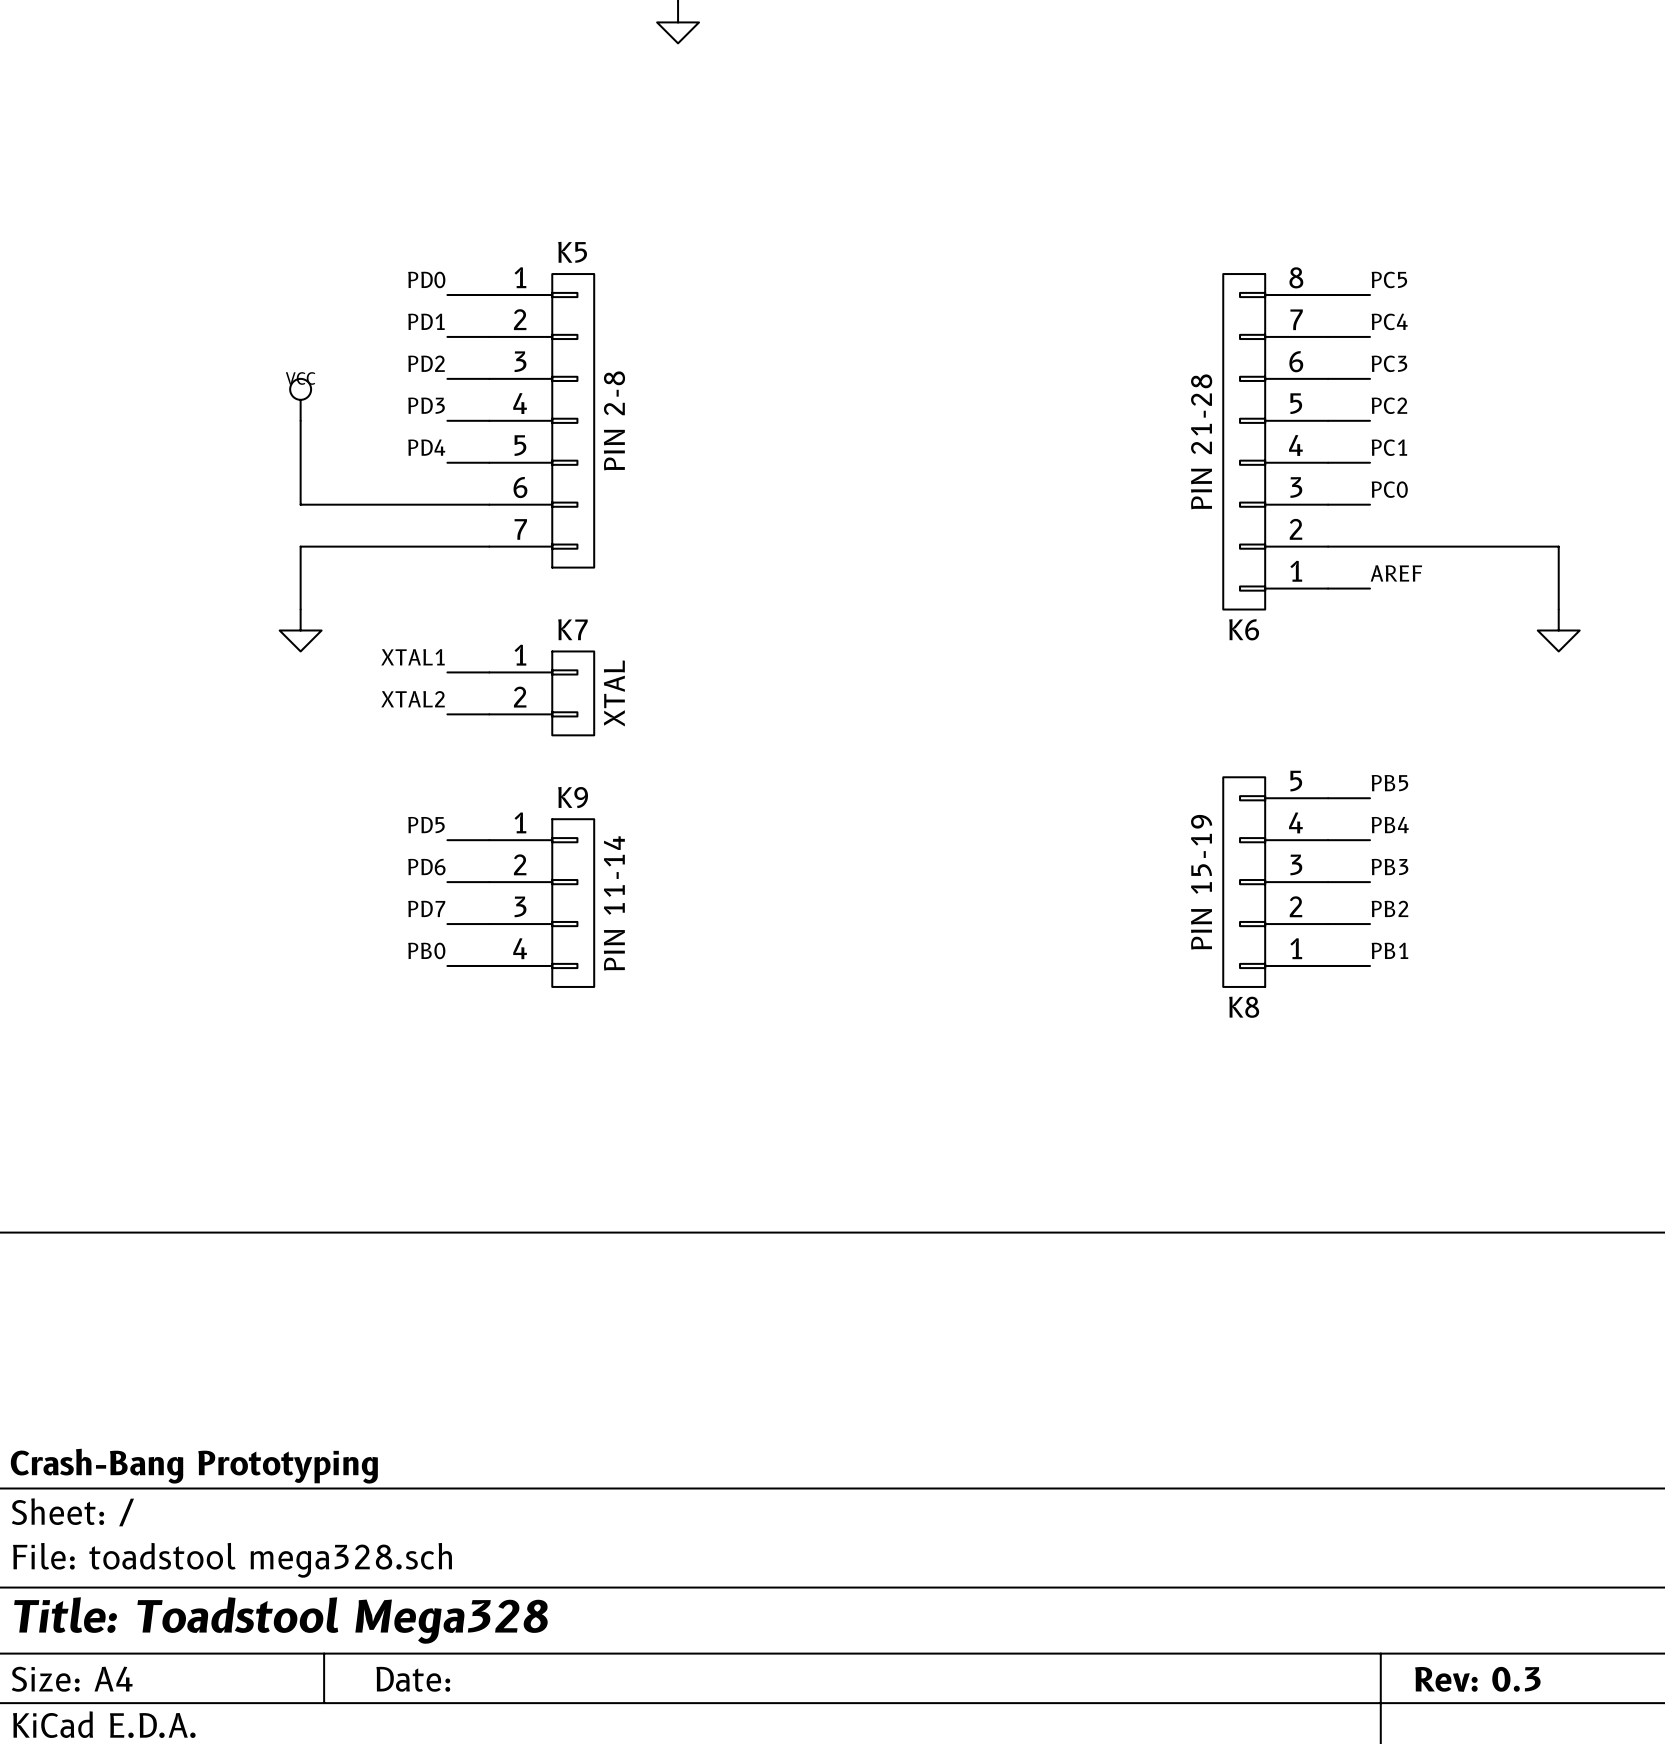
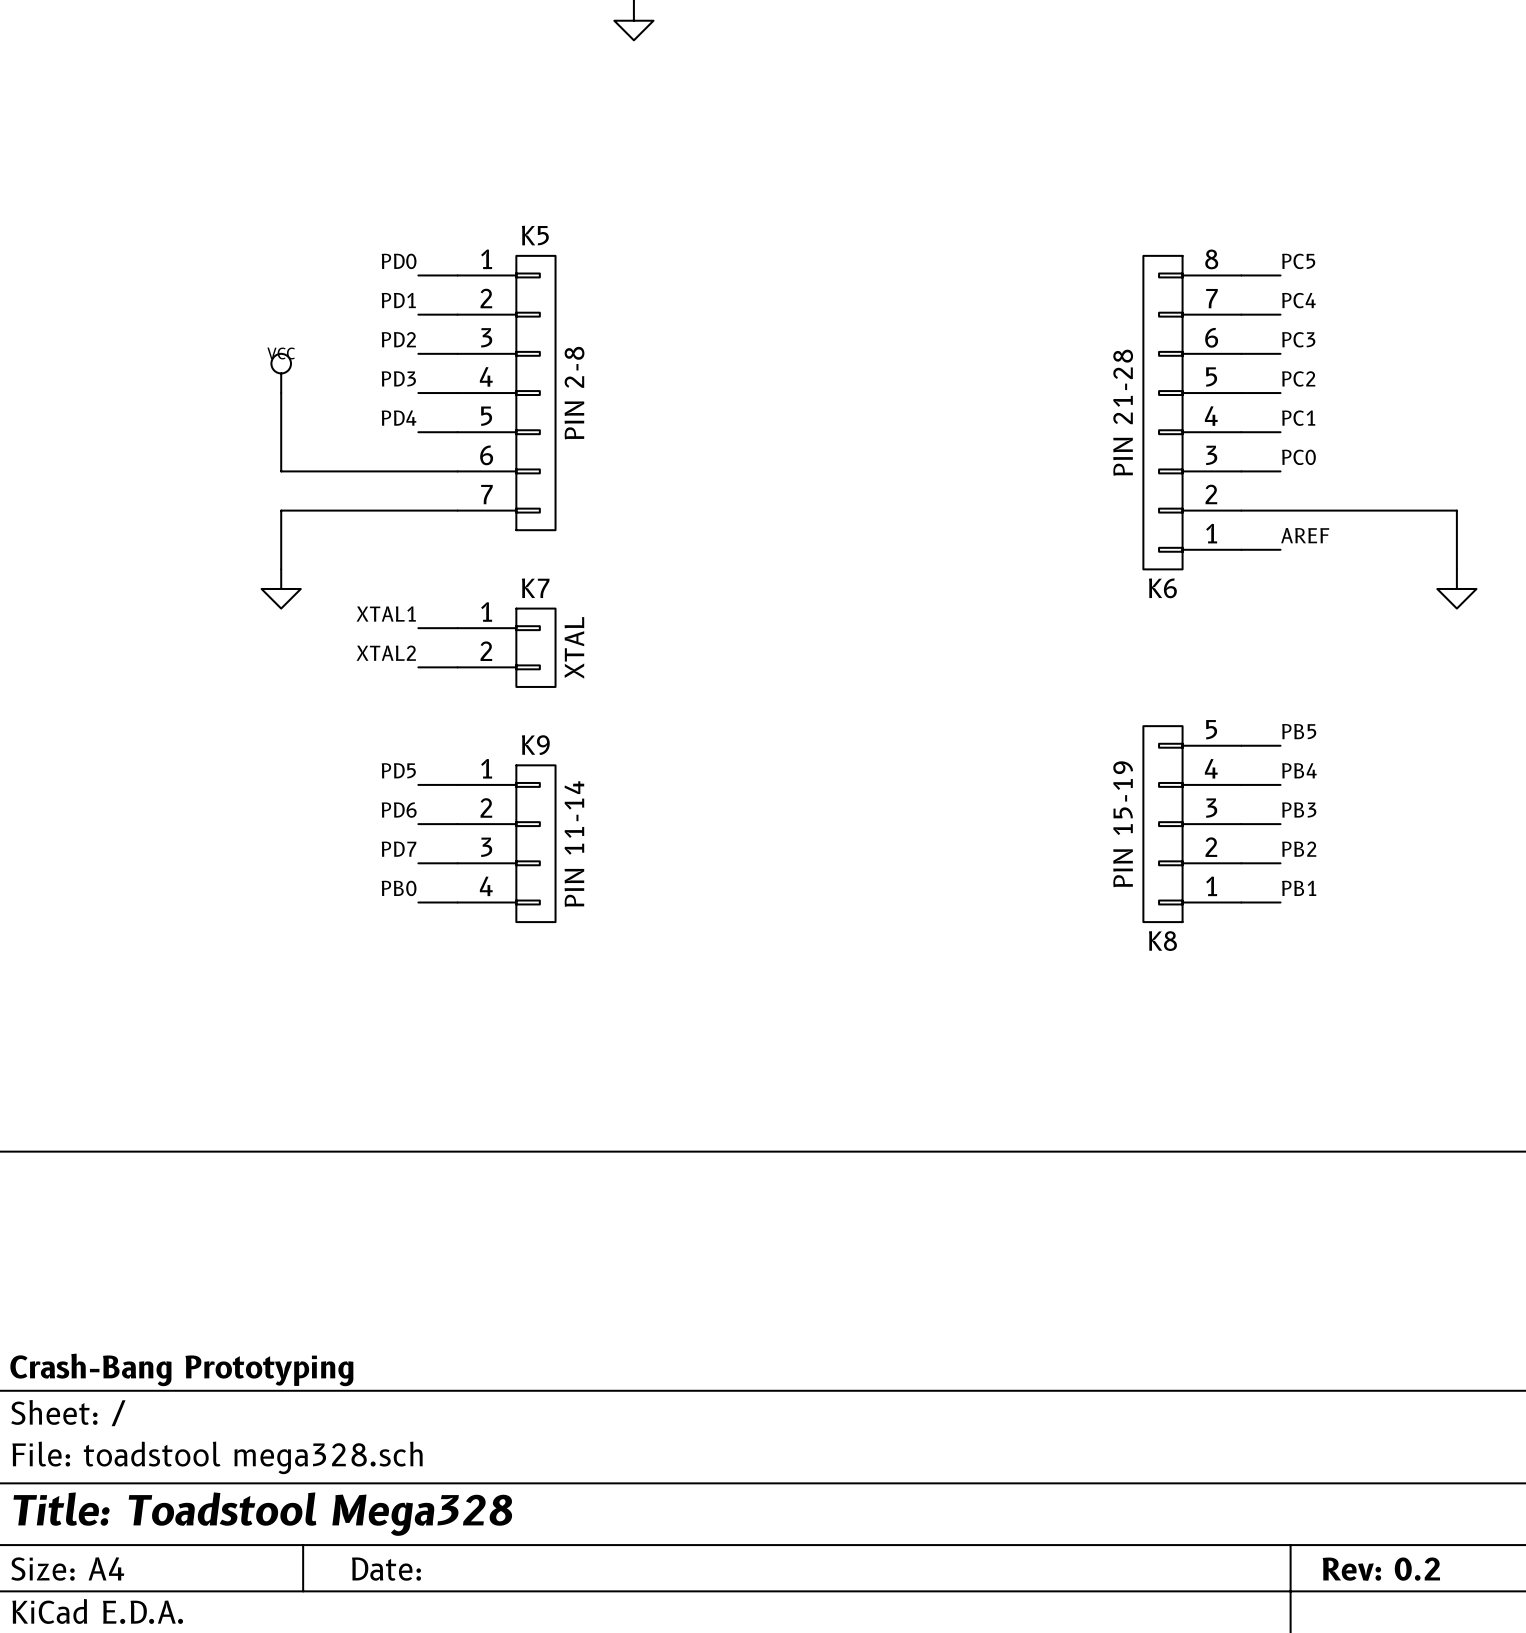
title block: Rev: 0.3 (1477, 1679) -> Rev: 0.2 (1381, 1569)

